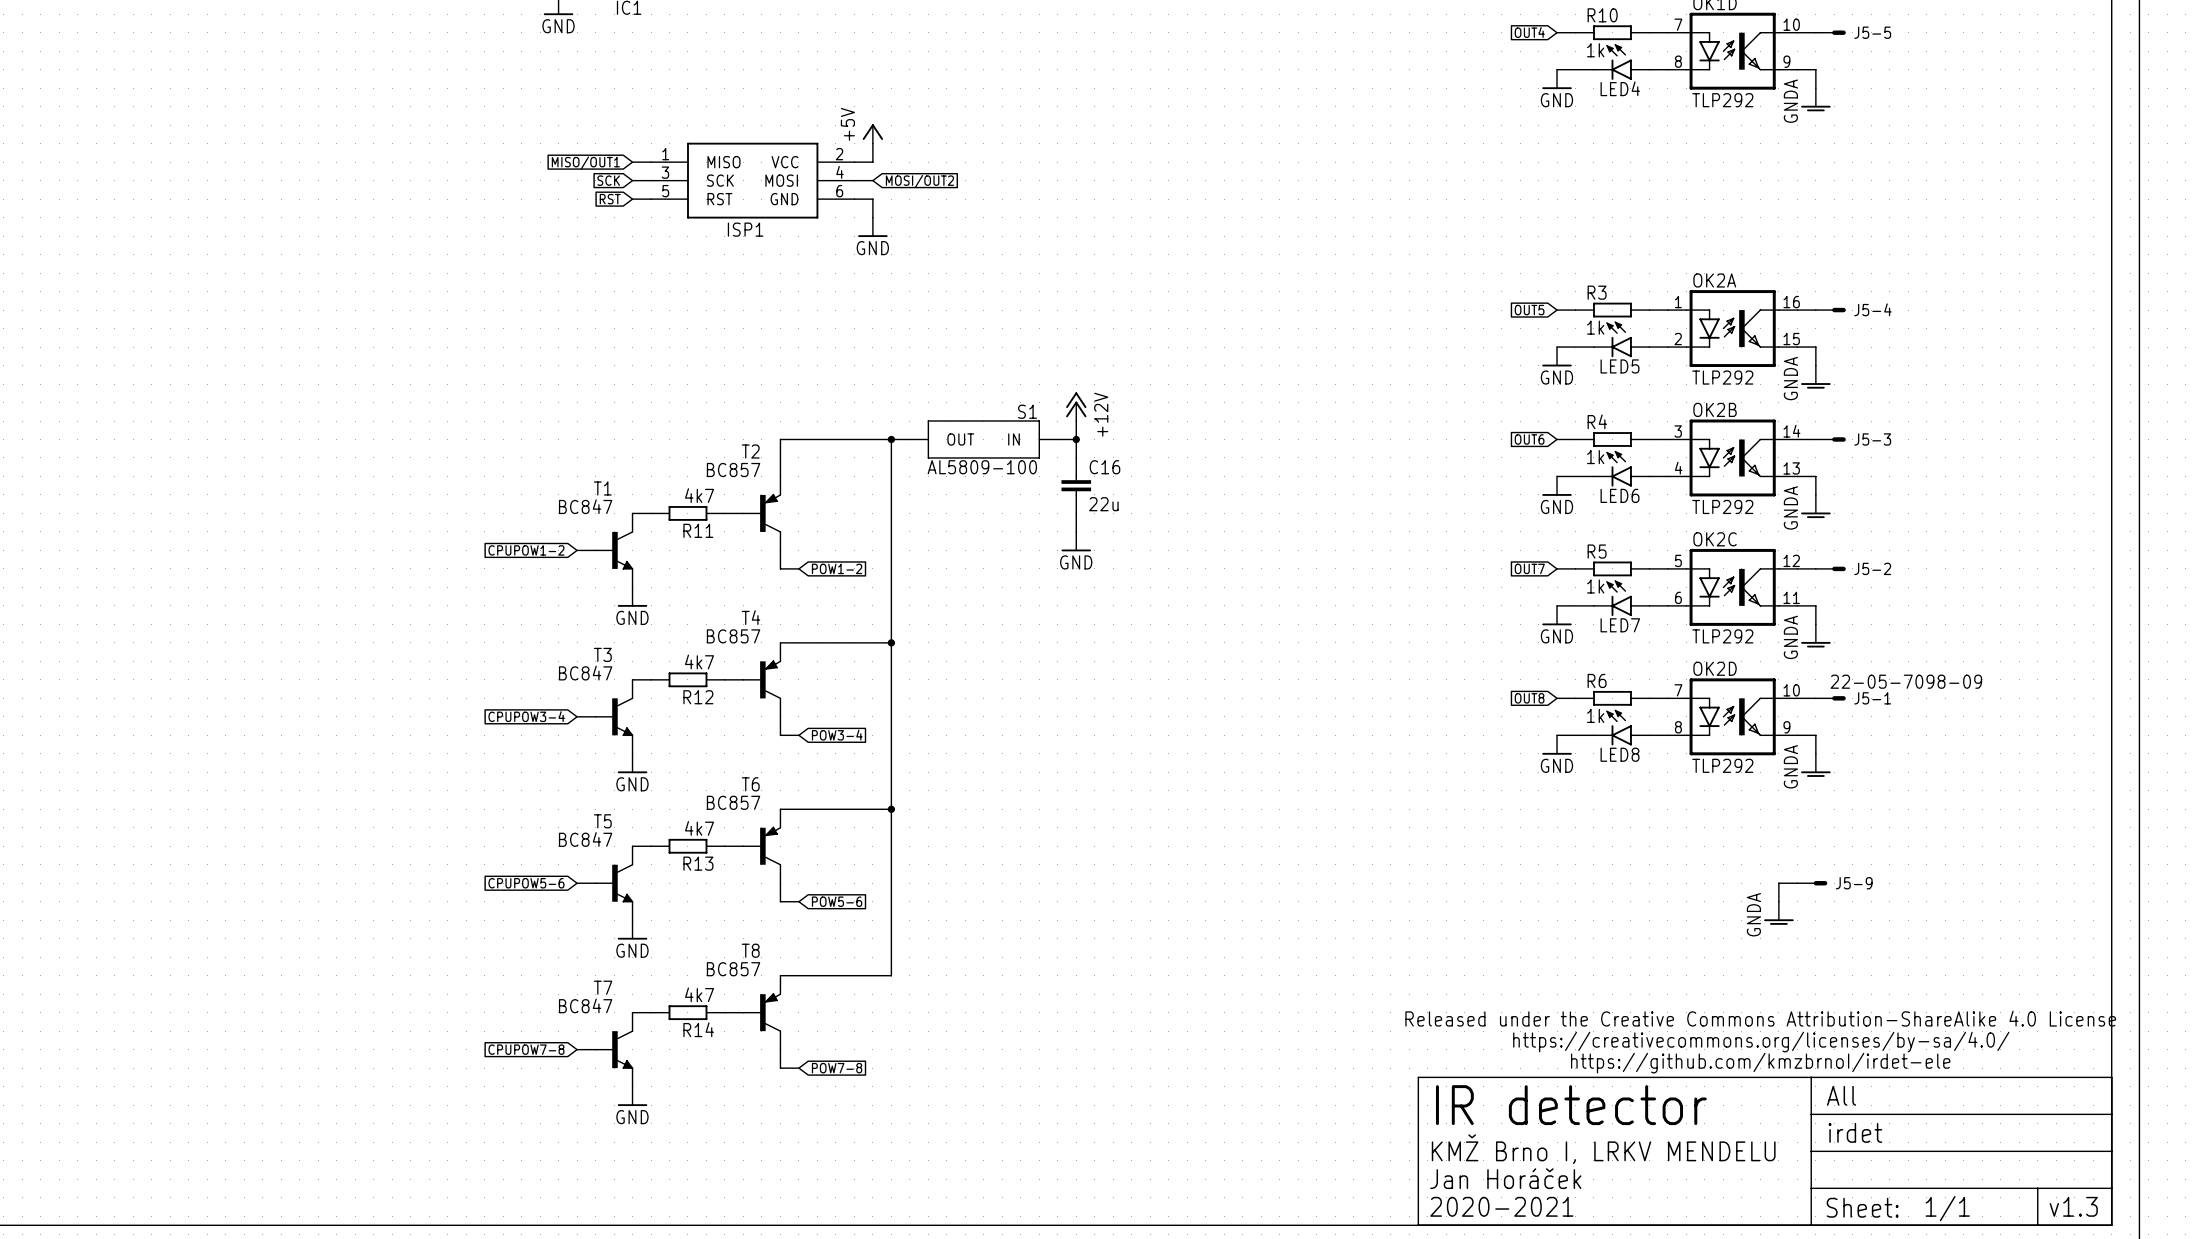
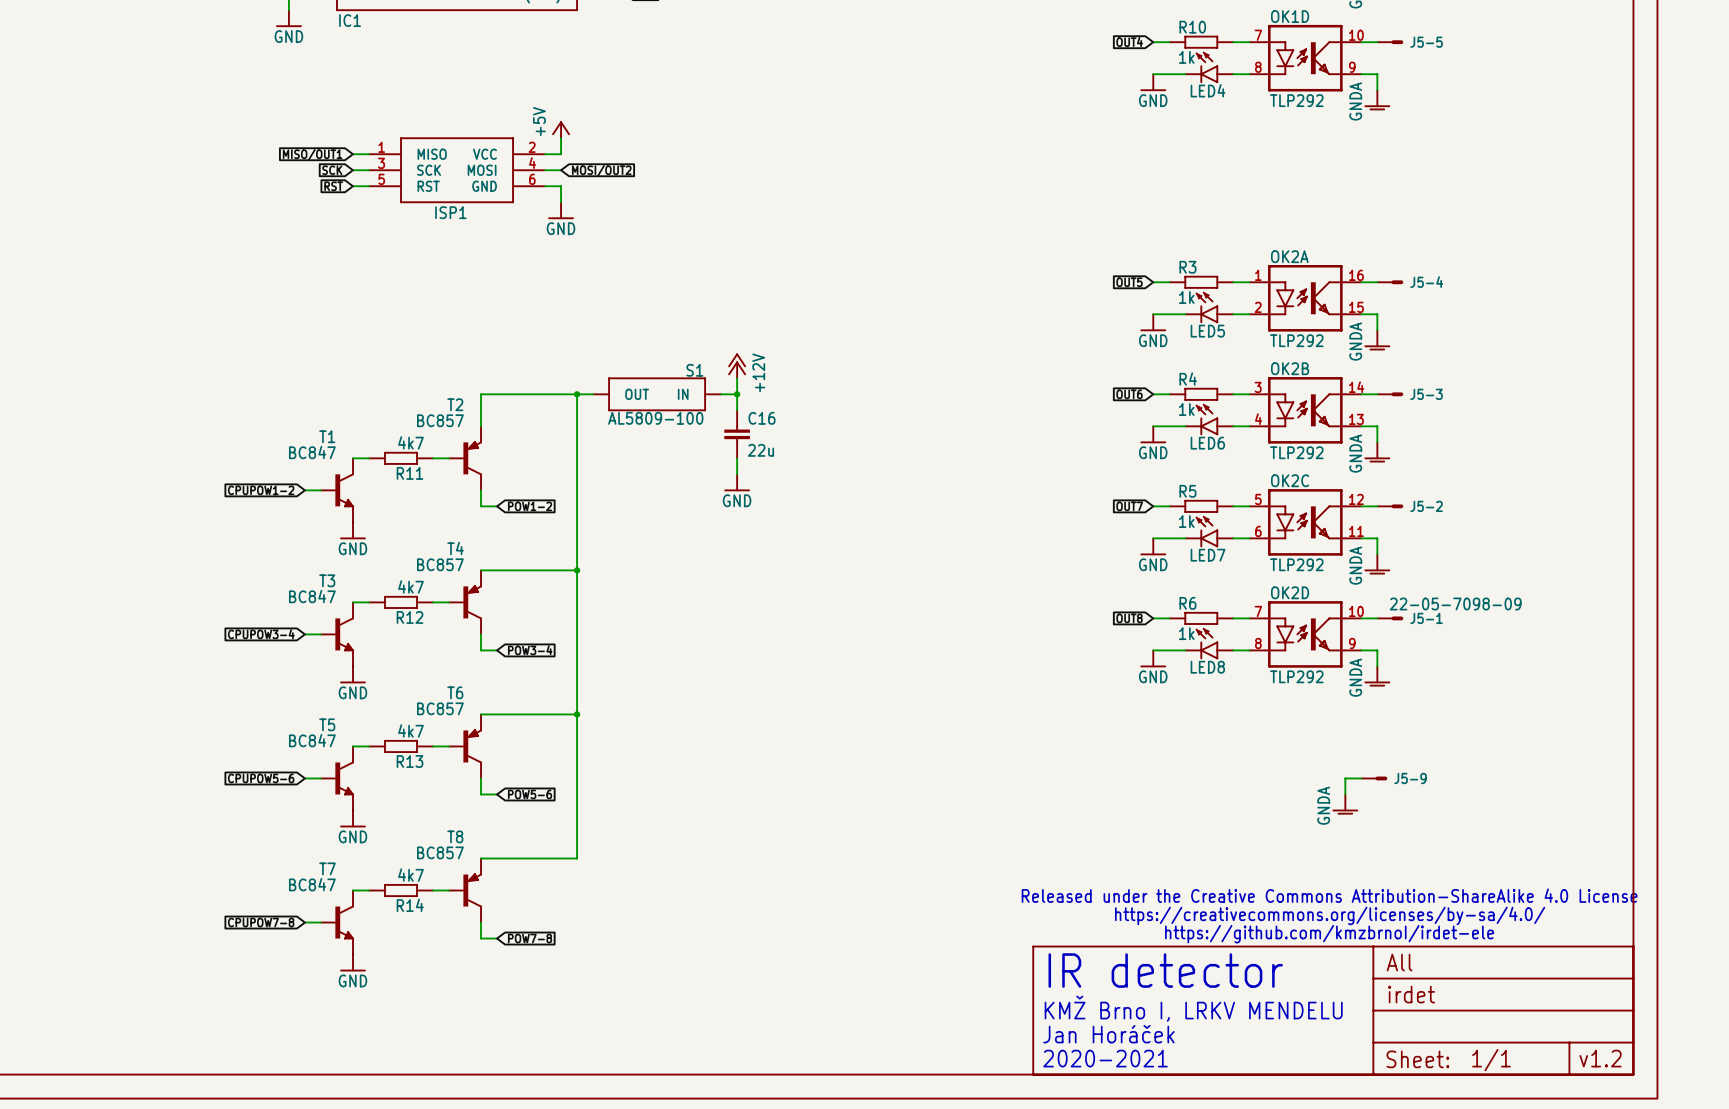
text: v1.3 (2073, 1206) -> v1.2 (1600, 1058)

